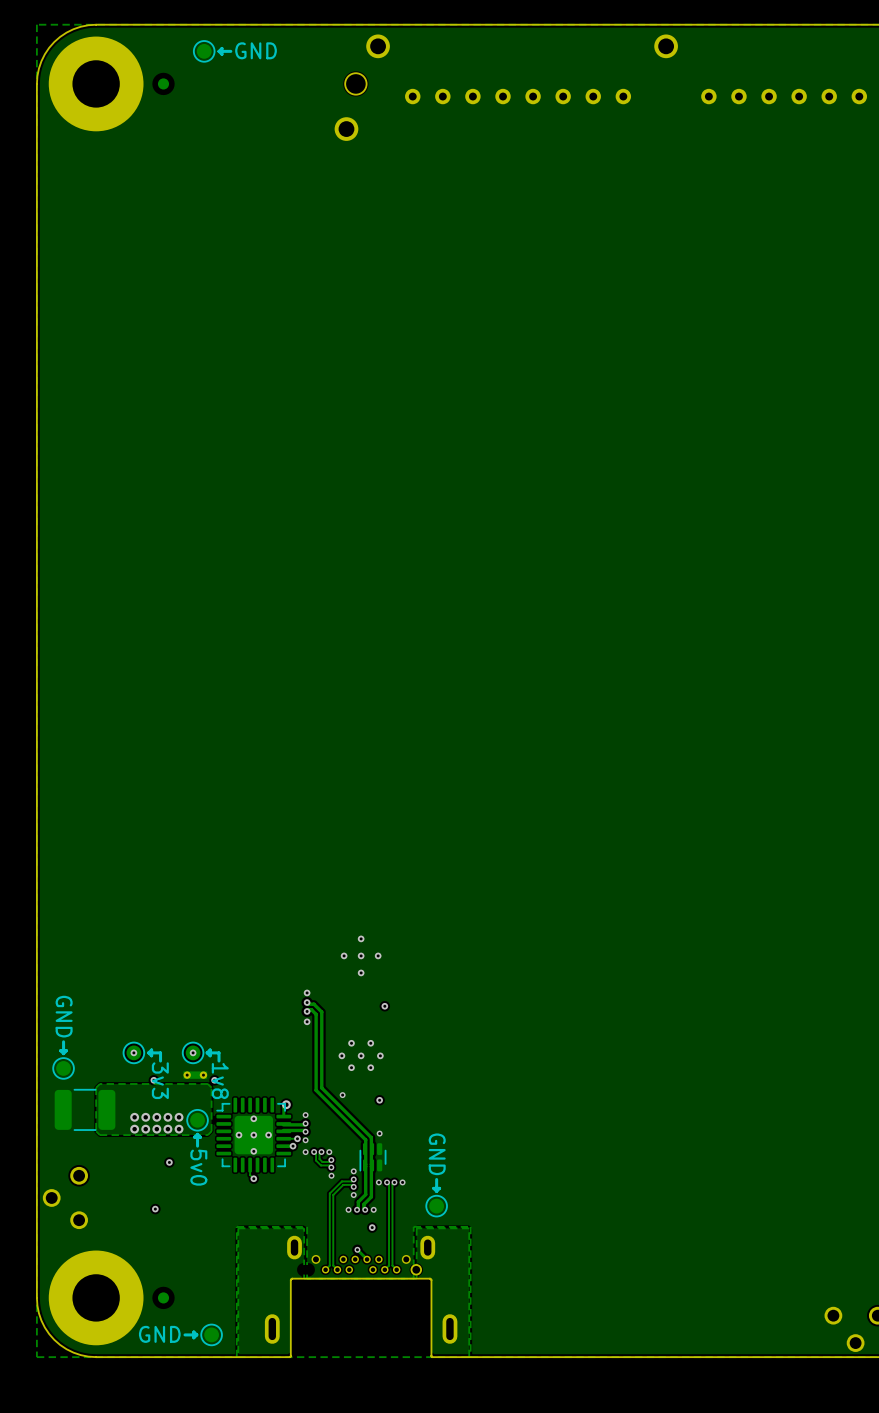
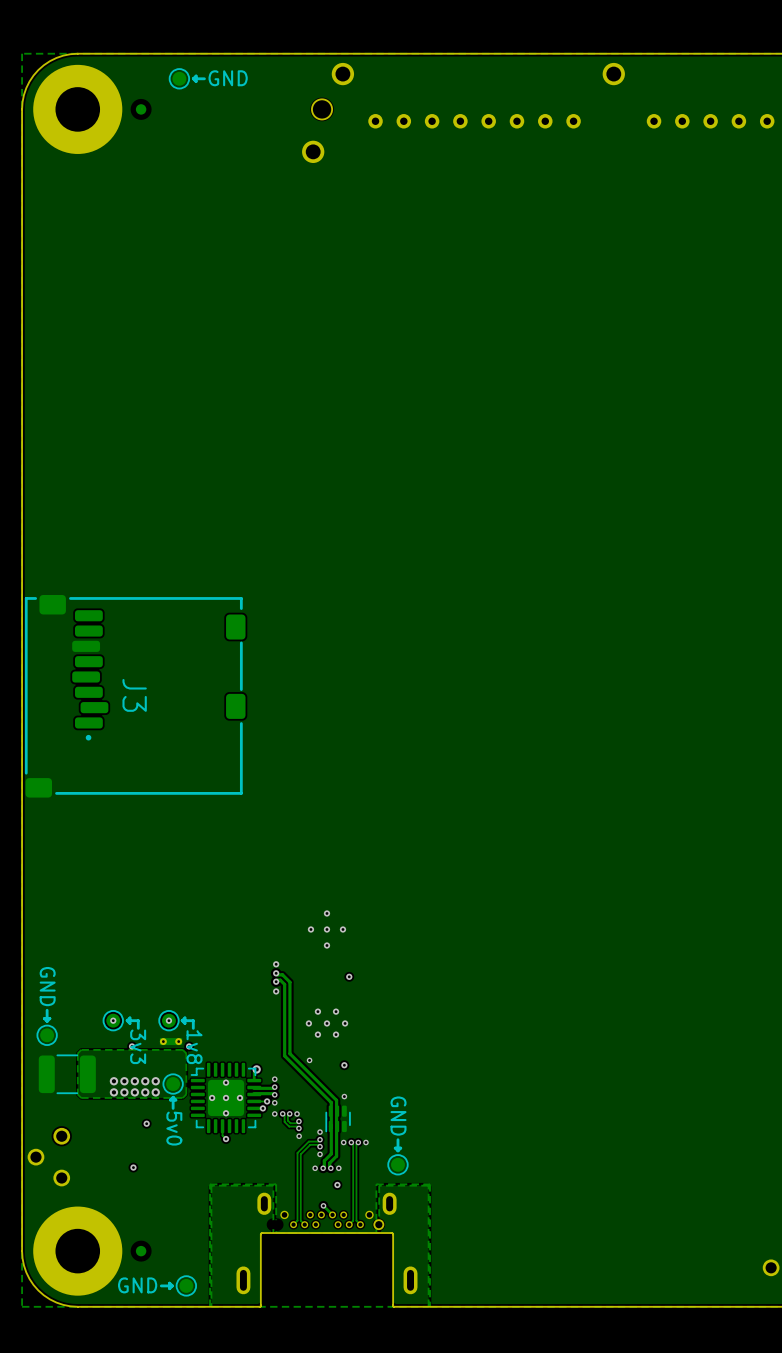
J3: none -> (135, 696)

